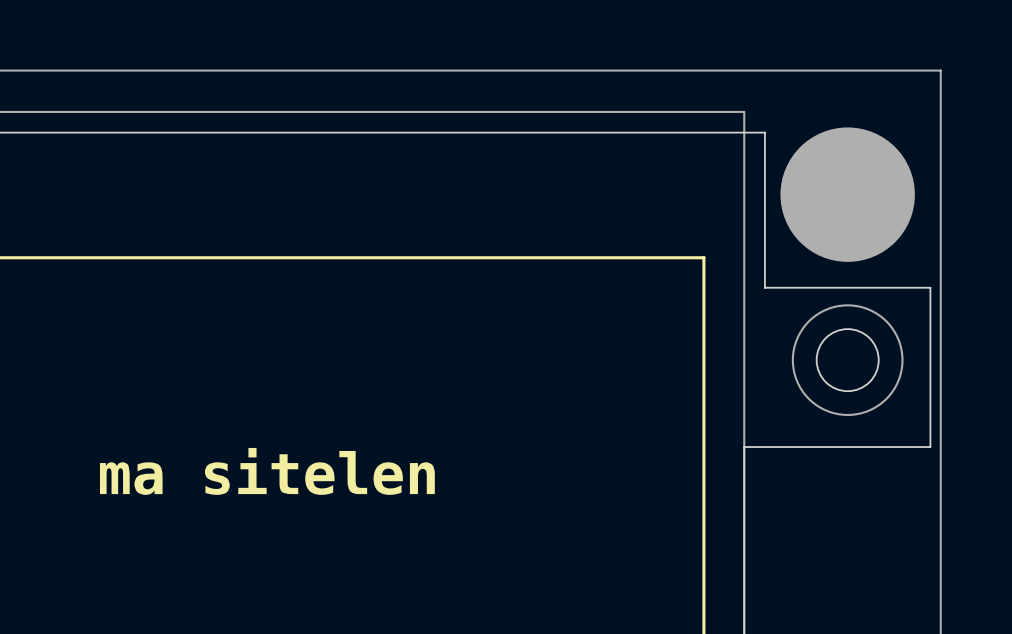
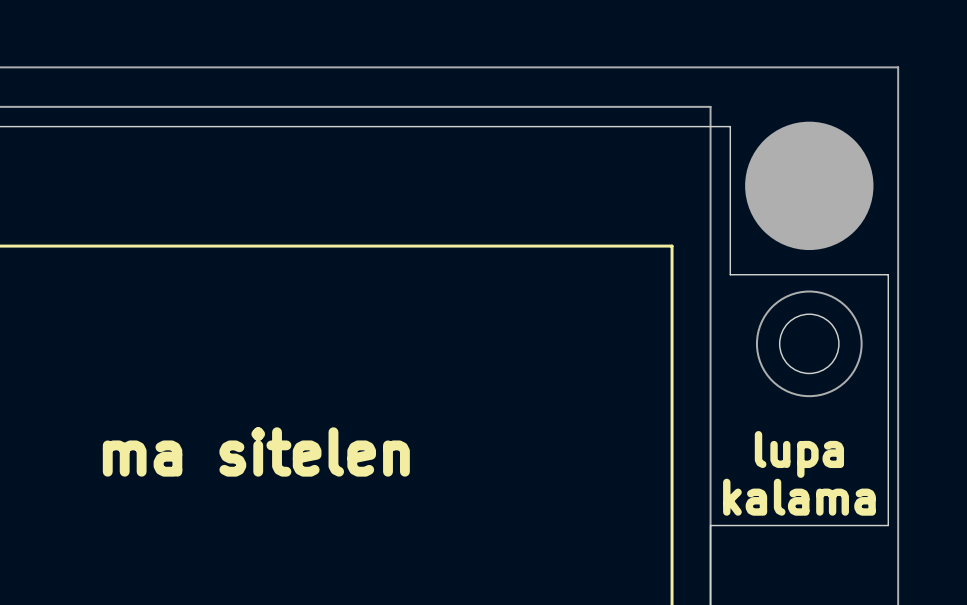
board edge: (930, 447) (744, 447) (744, 550) -> (888, 426) (888, 525) (710, 525)
text: none -> lupa (799, 454)
text: none -> kalama (799, 497)

